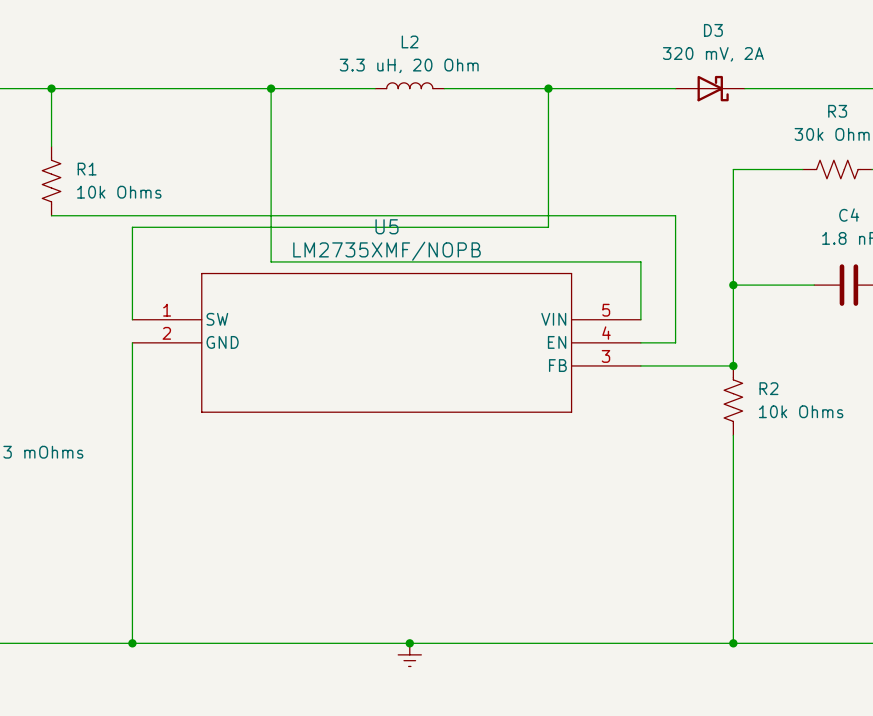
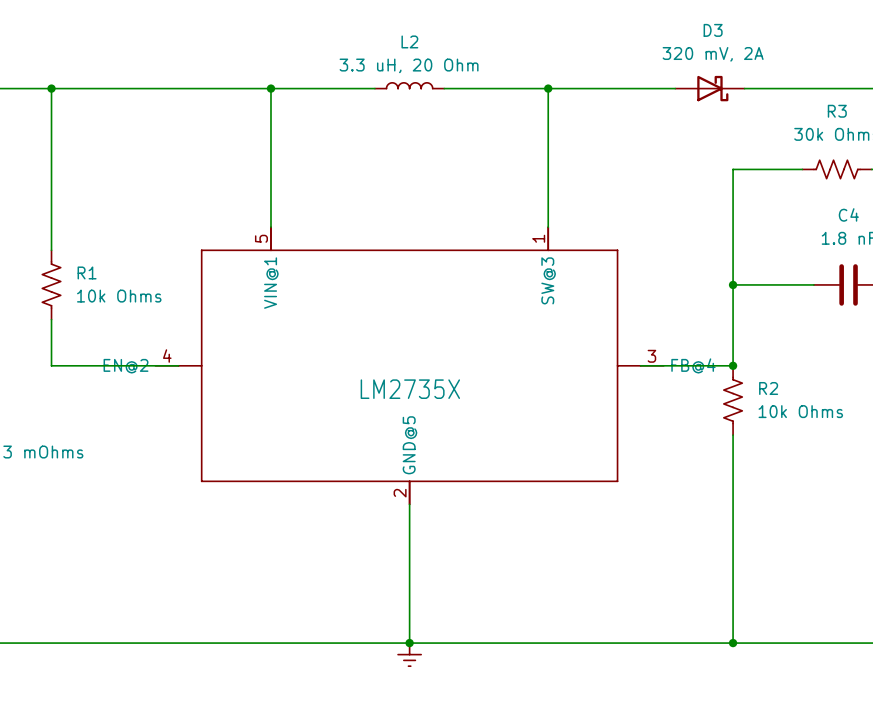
wire: none -> (51, 146) (51, 250)
R1 position: (51, 181) -> (51, 284)
wire: (51, 215) (675, 215) (675, 342) (640, 342) -> none
wire: (271, 227) (271, 261) (640, 261) (640, 319) -> none
wire: (548, 227) (132, 227) (132, 319) -> none
wire: none -> (51, 319) (51, 365) (178, 365)
wire: (132, 342) (132, 643) -> none
U5: LM2735XMF/NOPB (386, 342) -> none
part: none -> LM2735X (409, 365)
wire: none -> (409, 504) (409, 643)
junction: (132, 643) -> none

